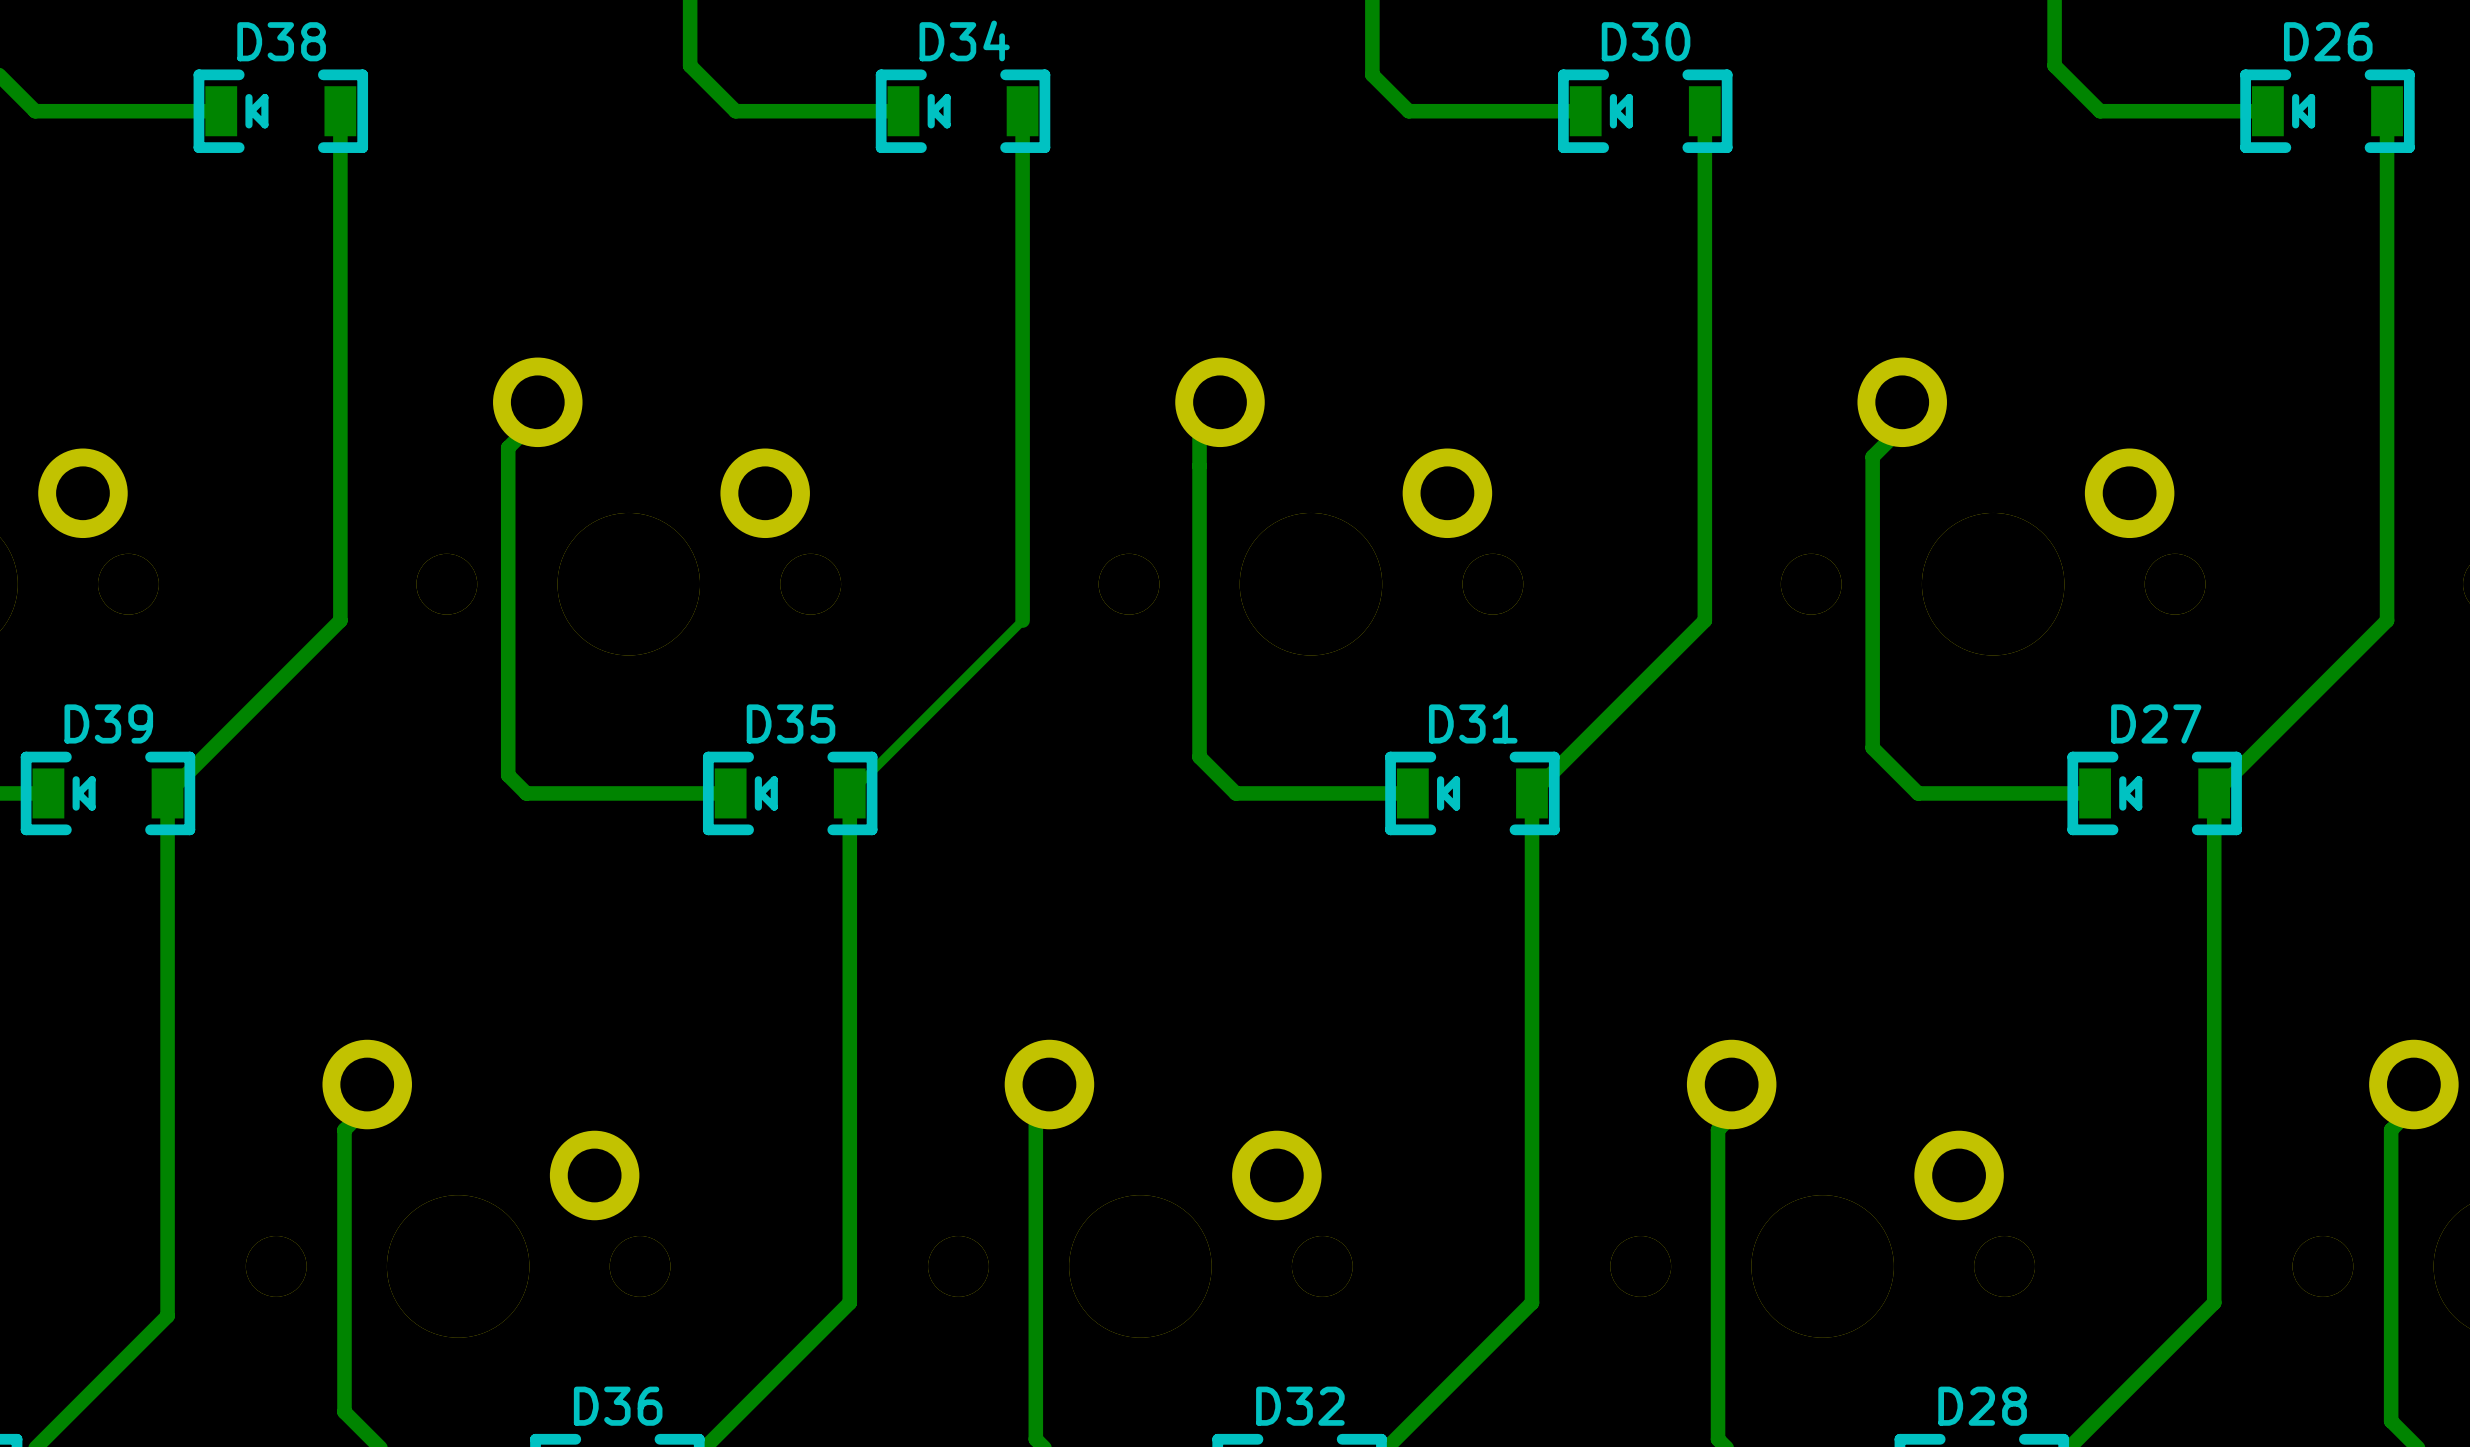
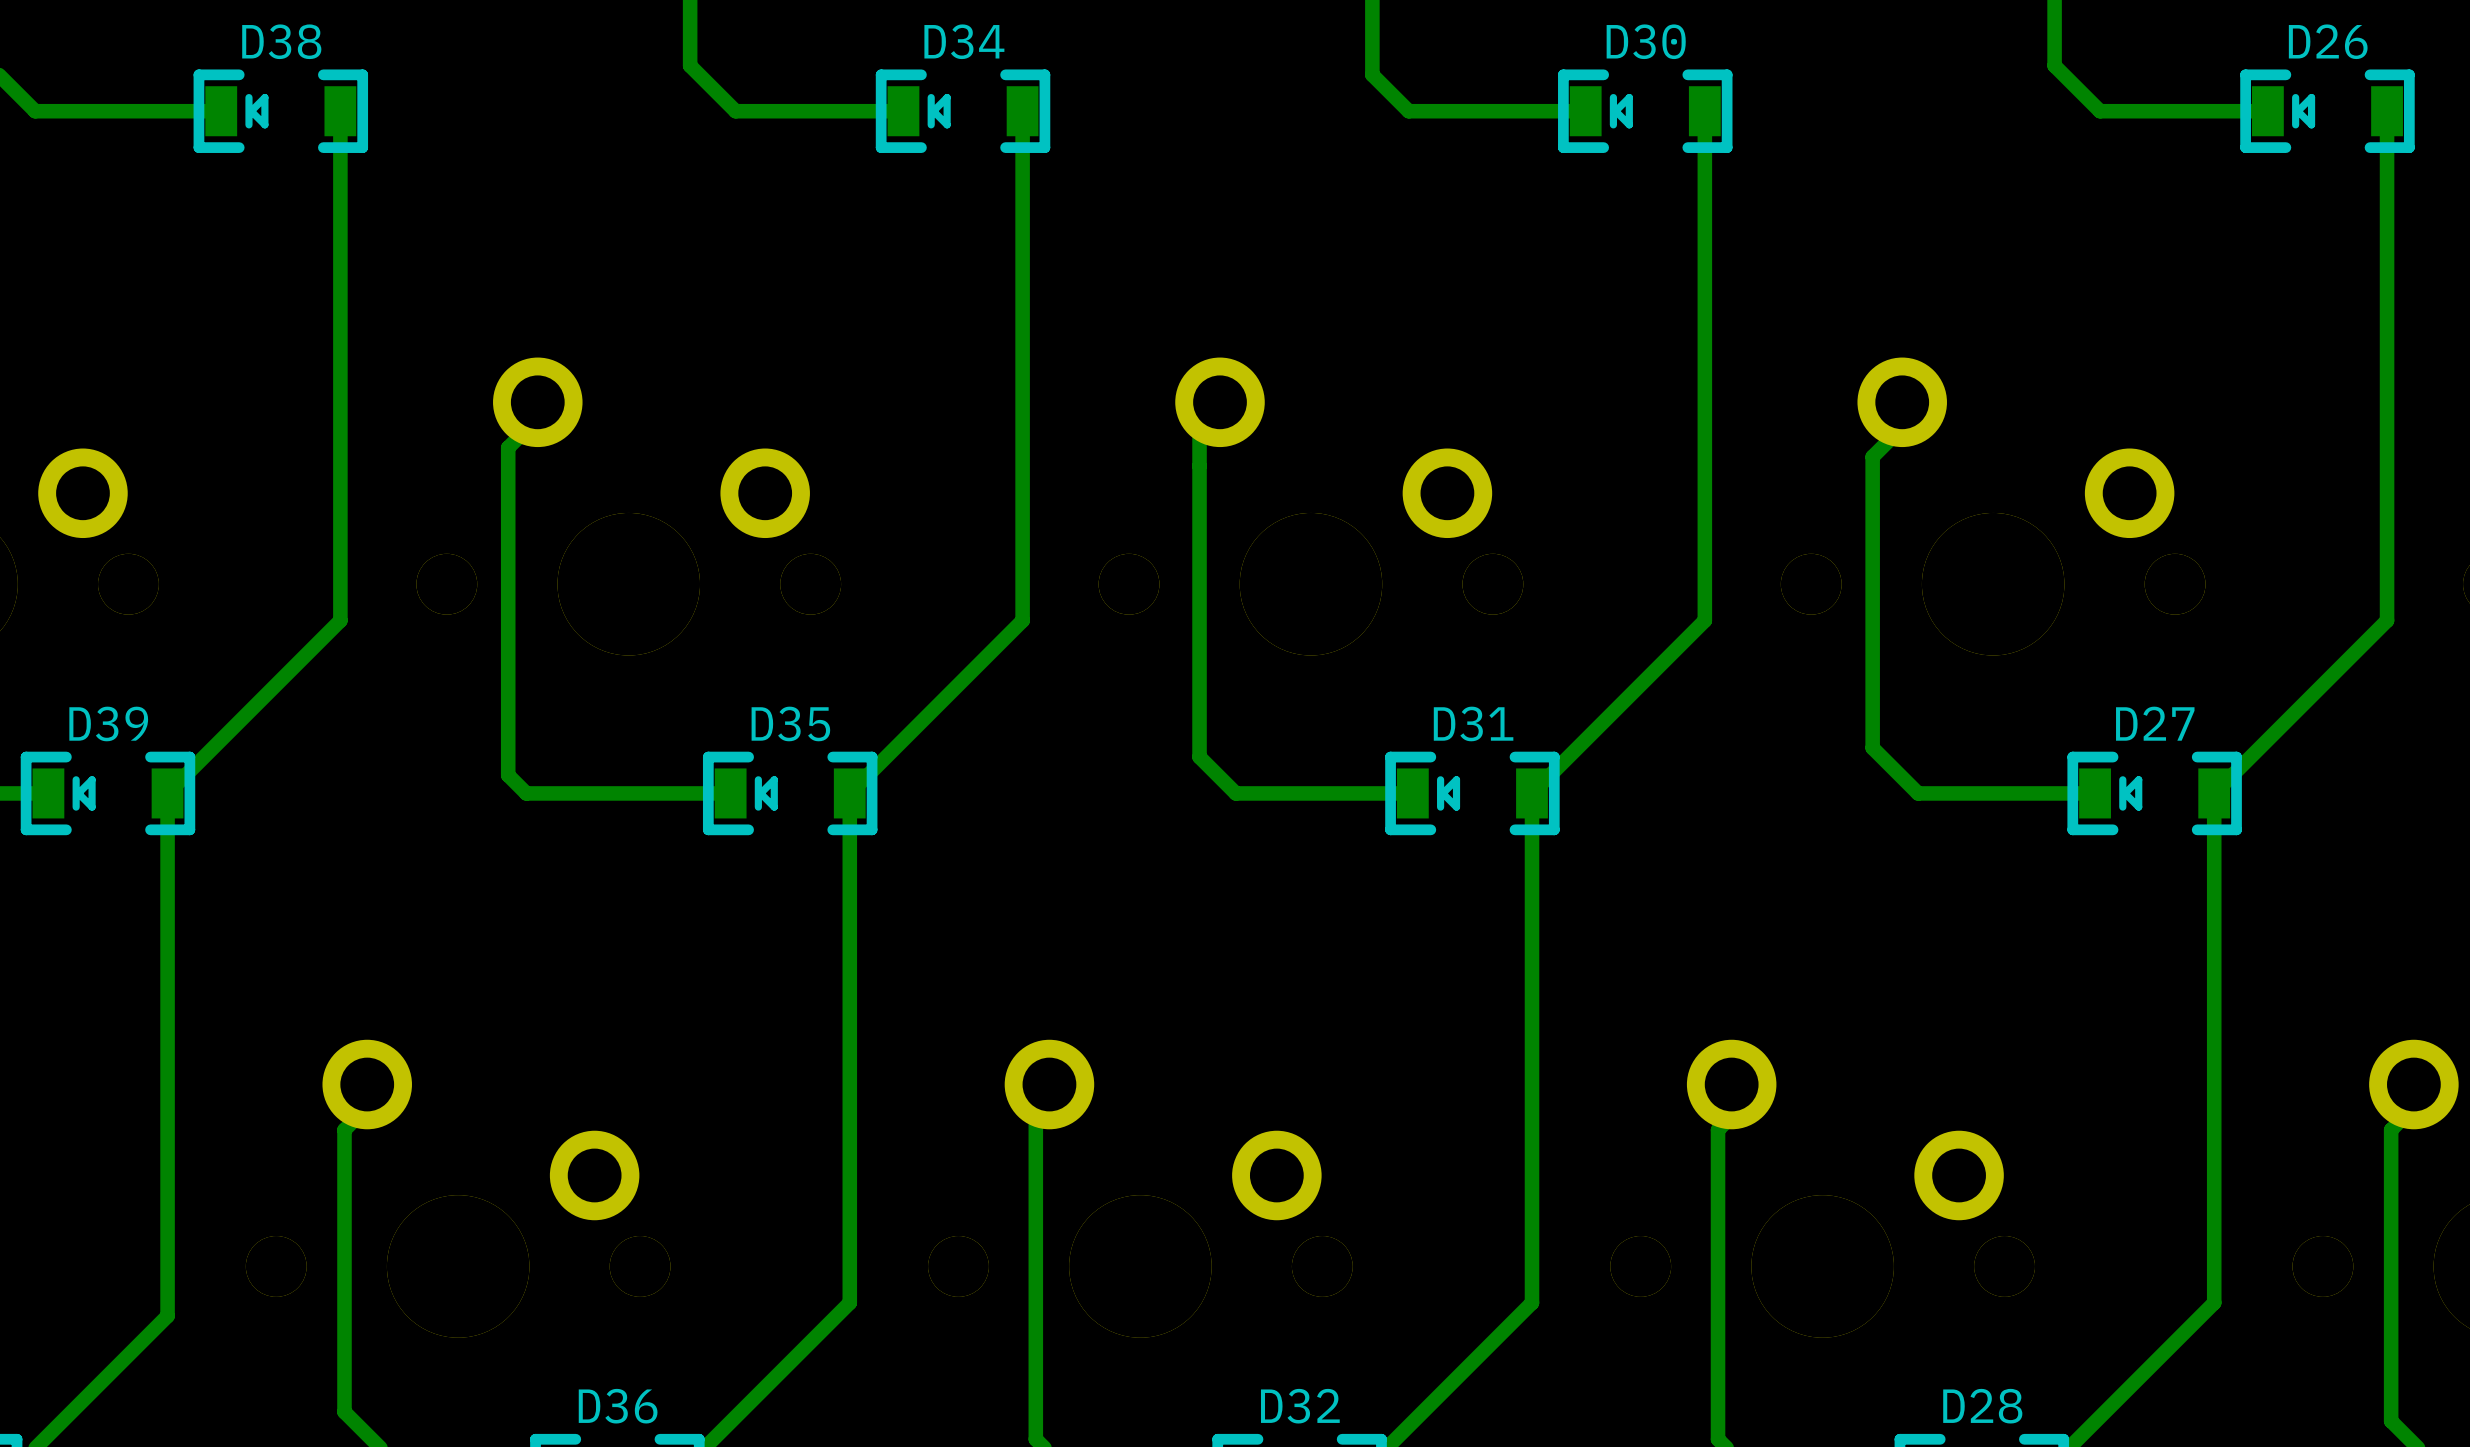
track width: thin (1022, 620) (849, 793) -> thick (1022, 620) (849, 793)

